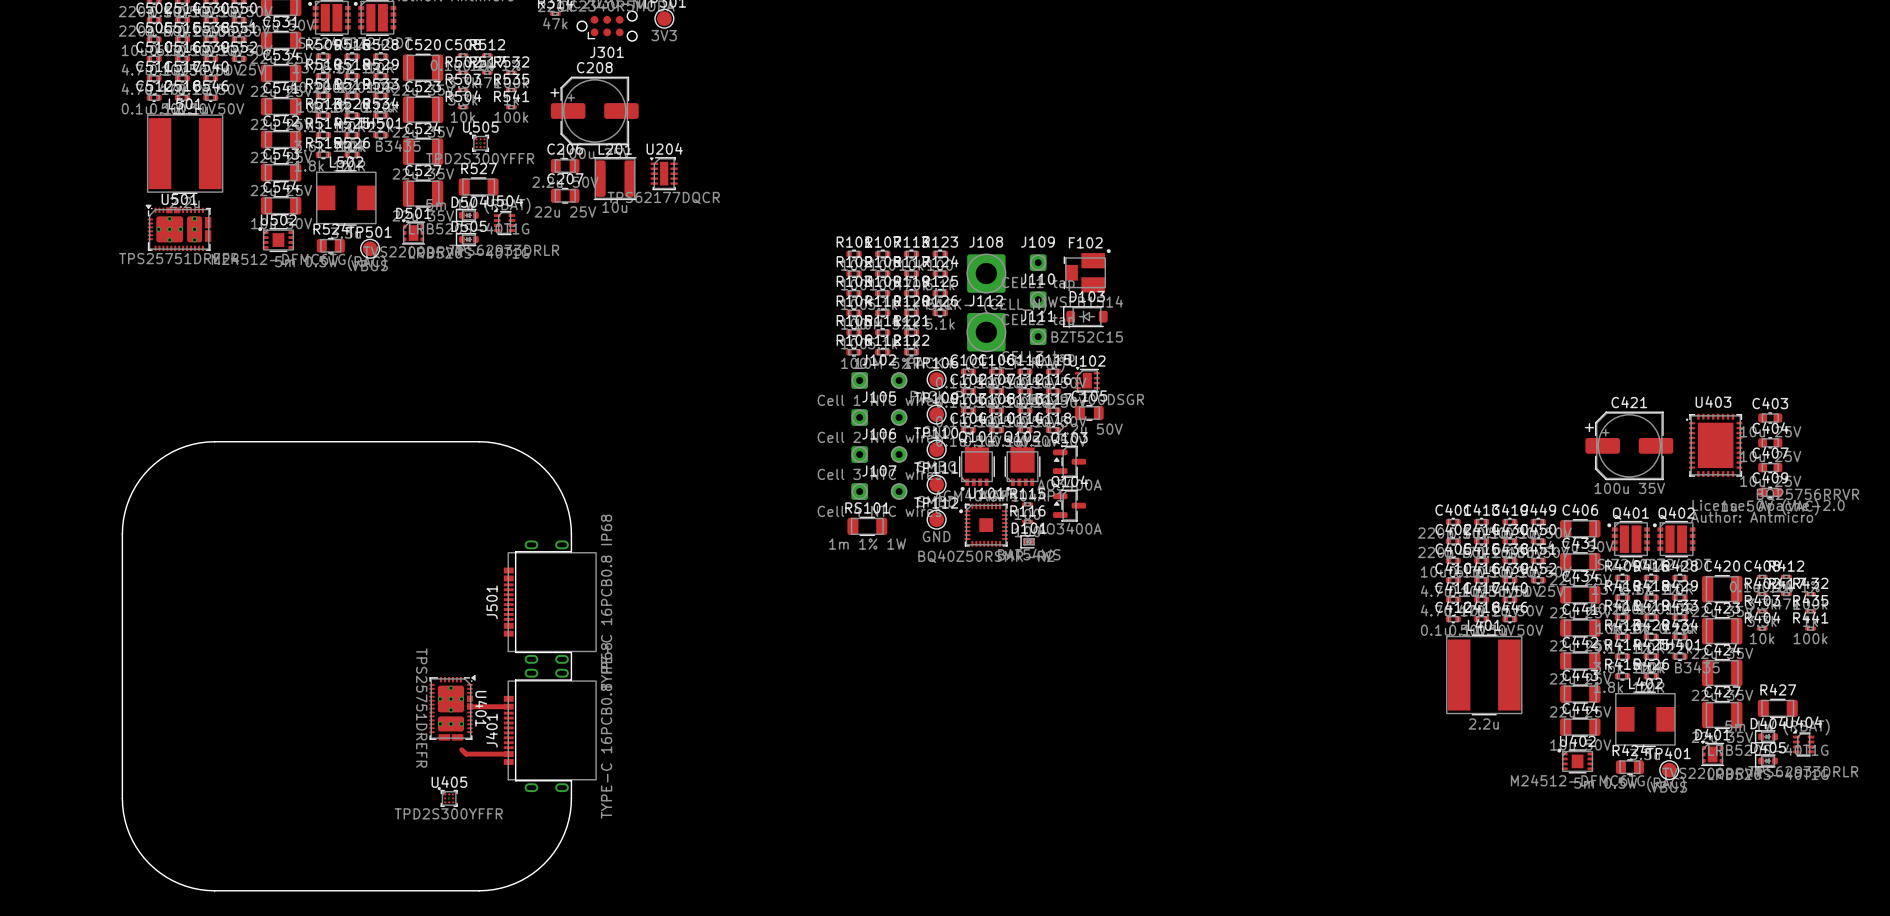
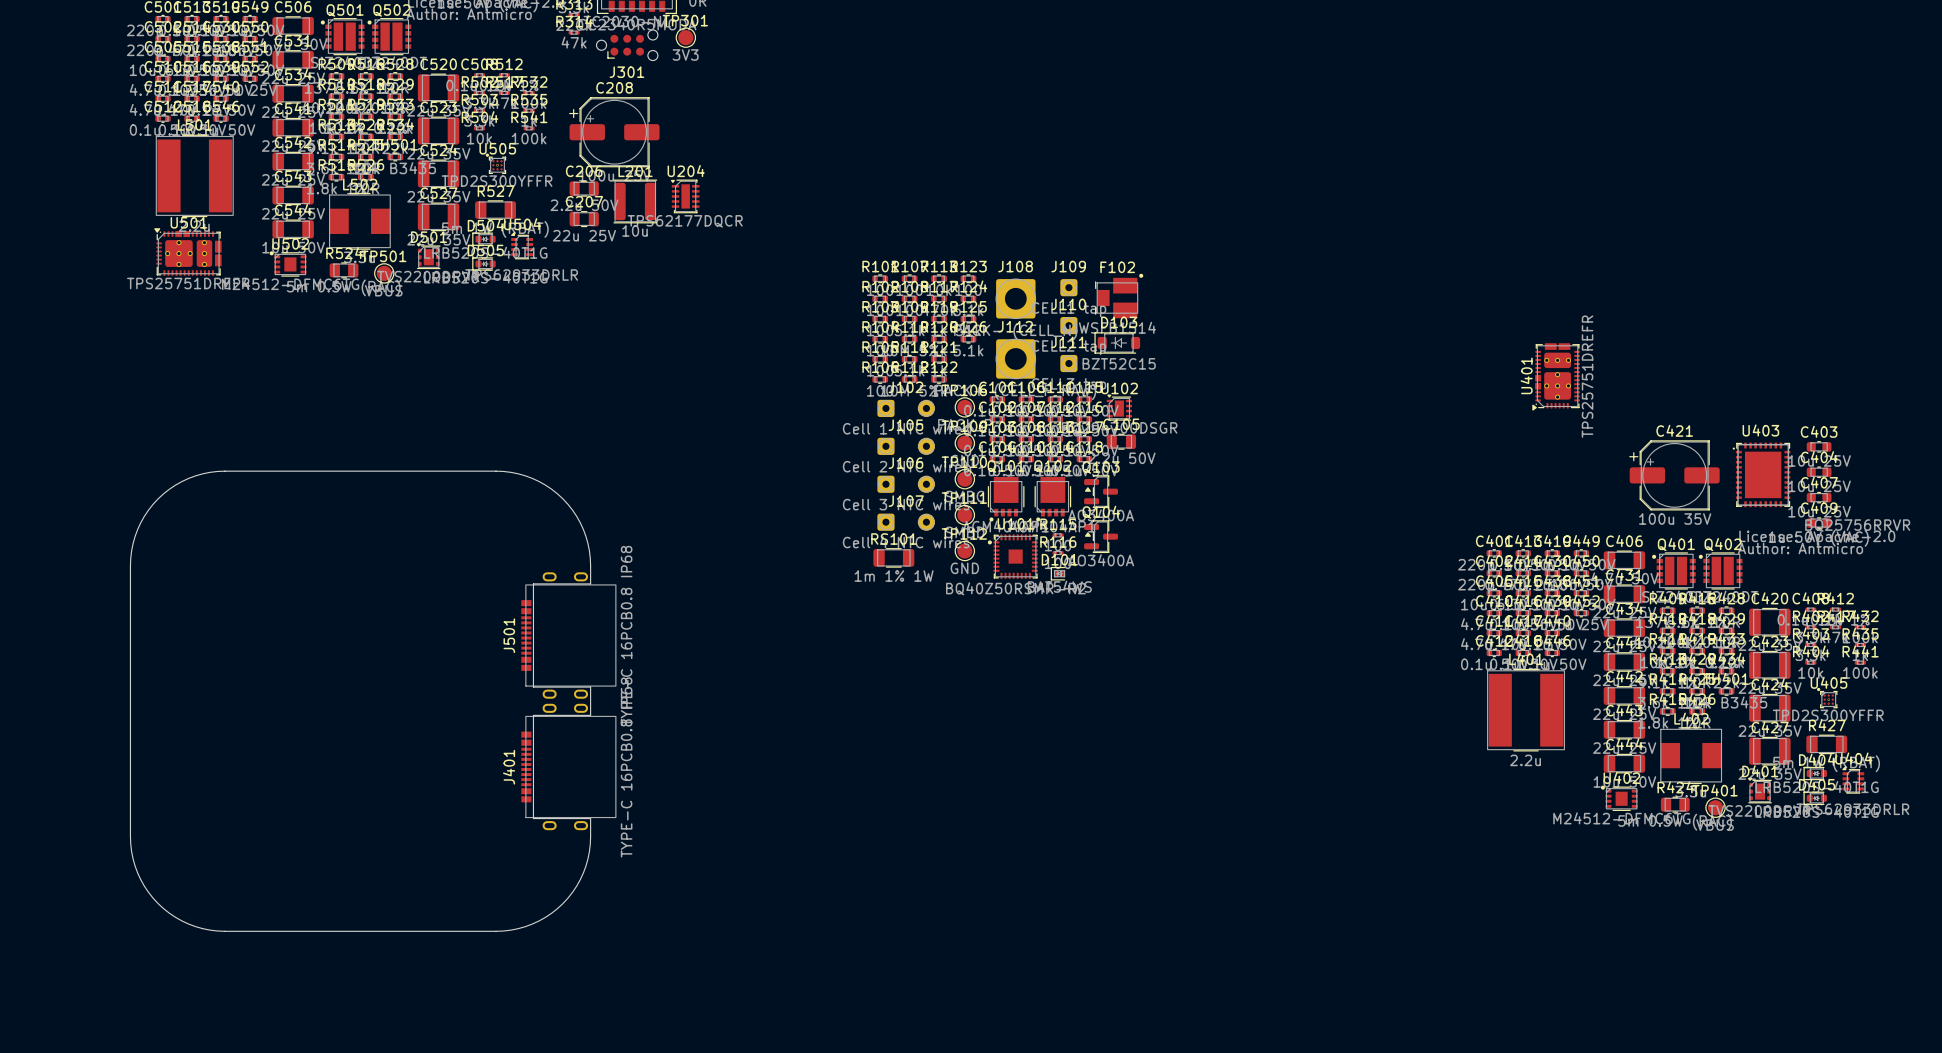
track: (469, 706) (508, 706) -> none
U401 rotation: 0° (452, 707) -> 180° (1556, 376)
U401 position: (452, 707) -> (1556, 376)
track: (461, 749) (466, 754) (508, 754) -> none
U405 position: (447, 796) -> (1827, 698)

